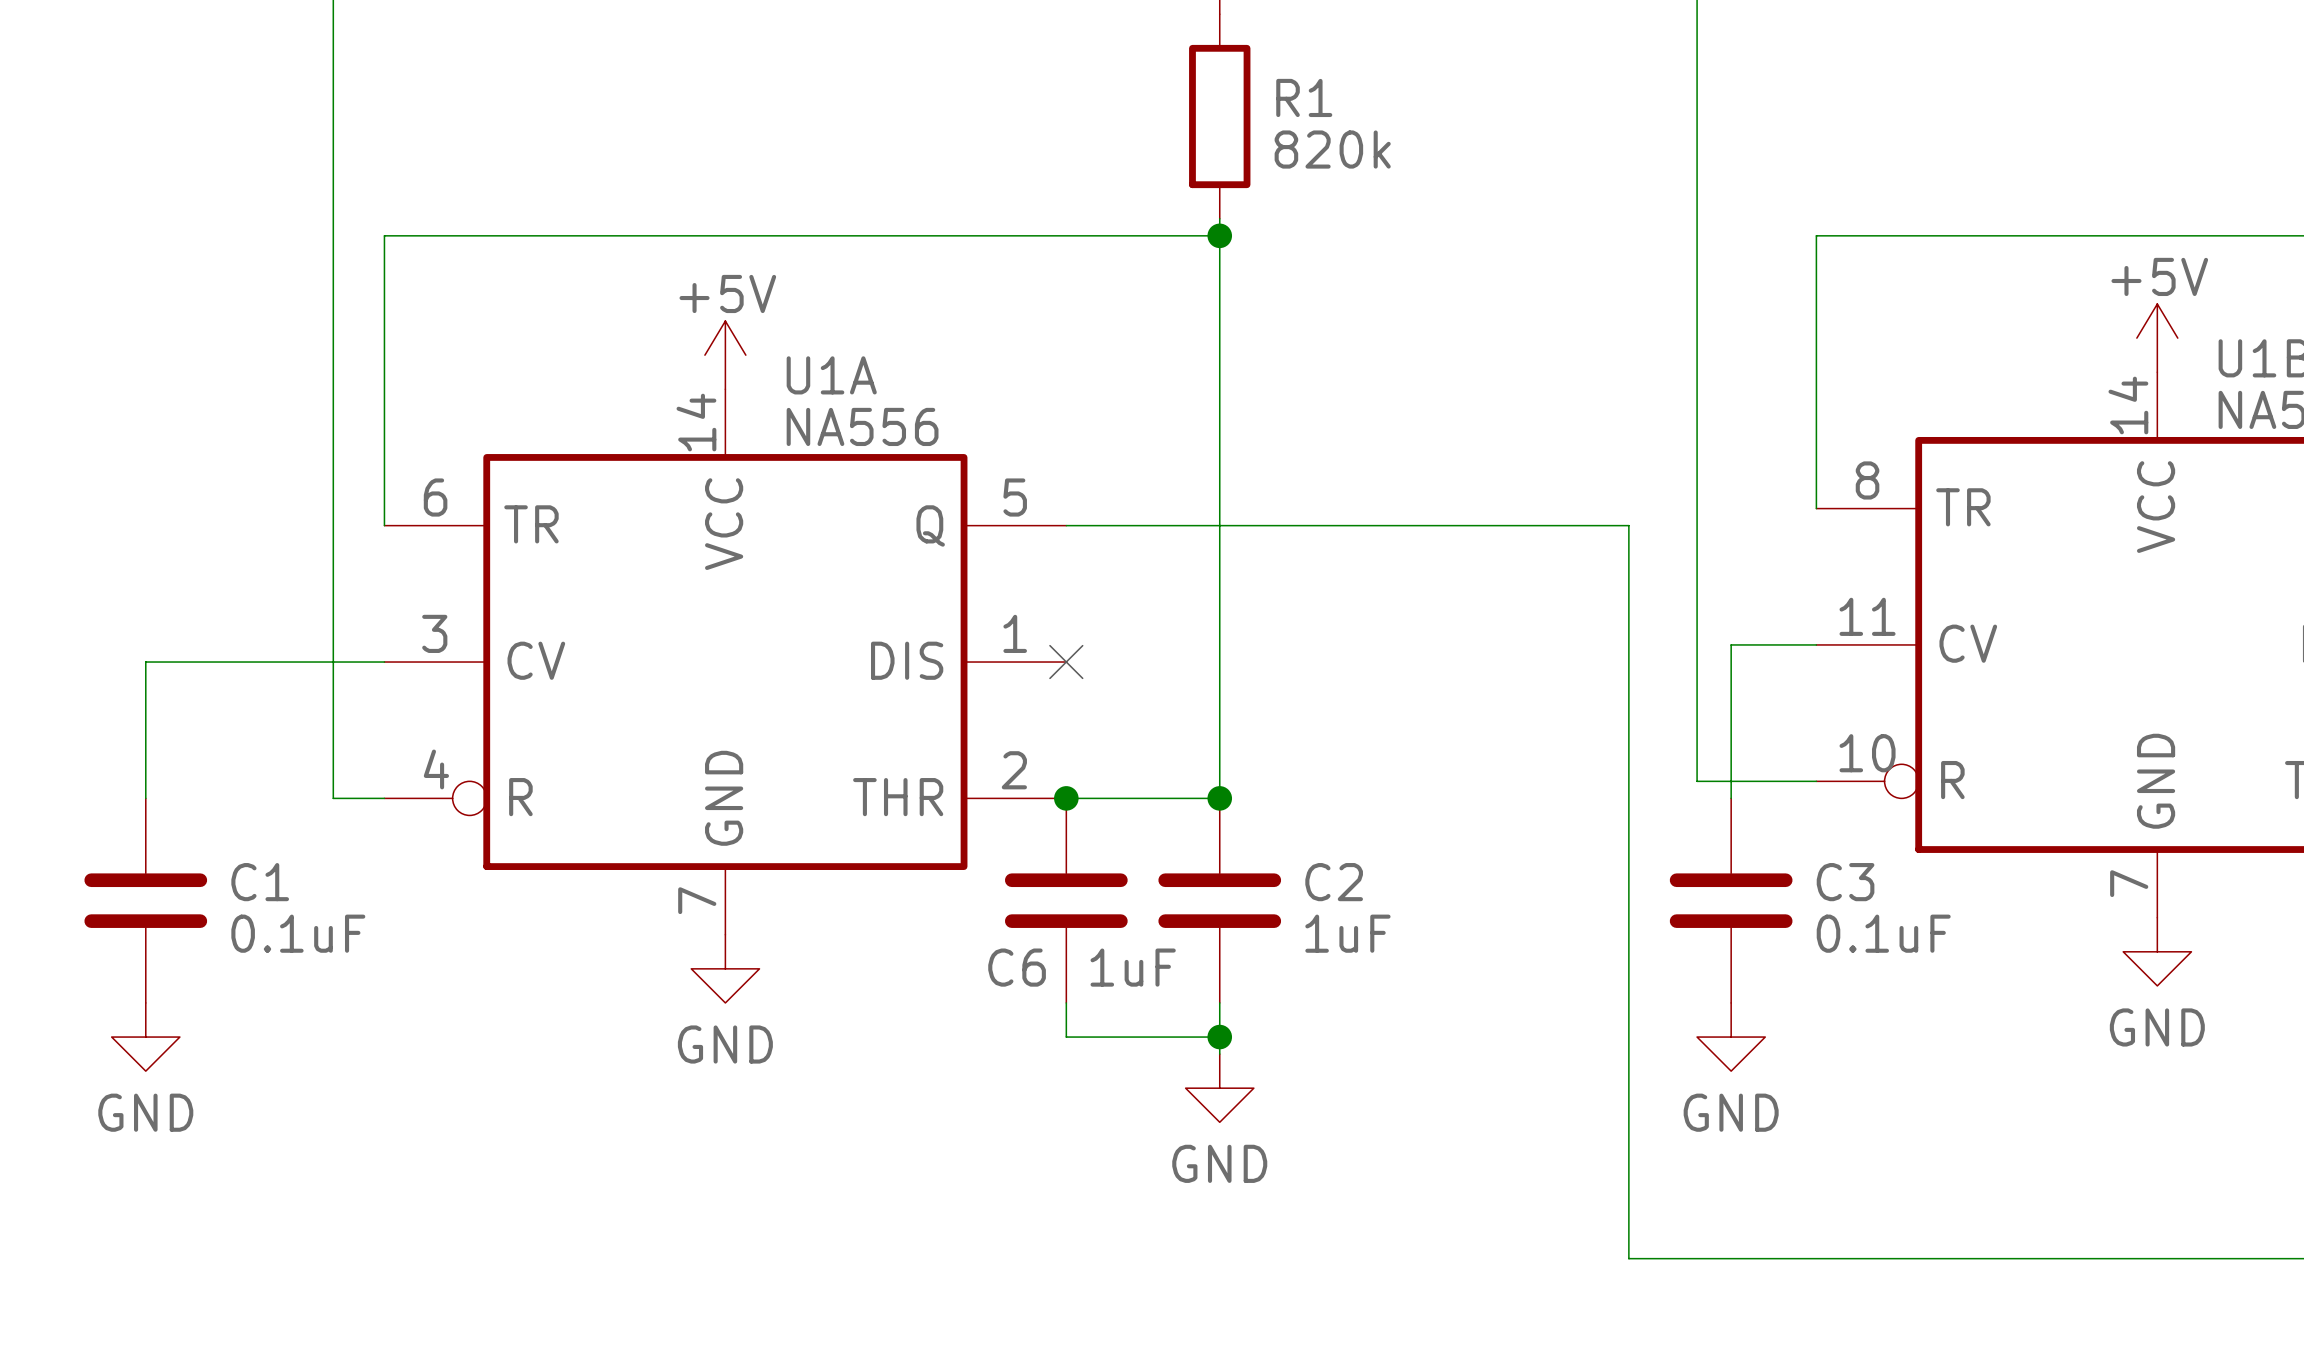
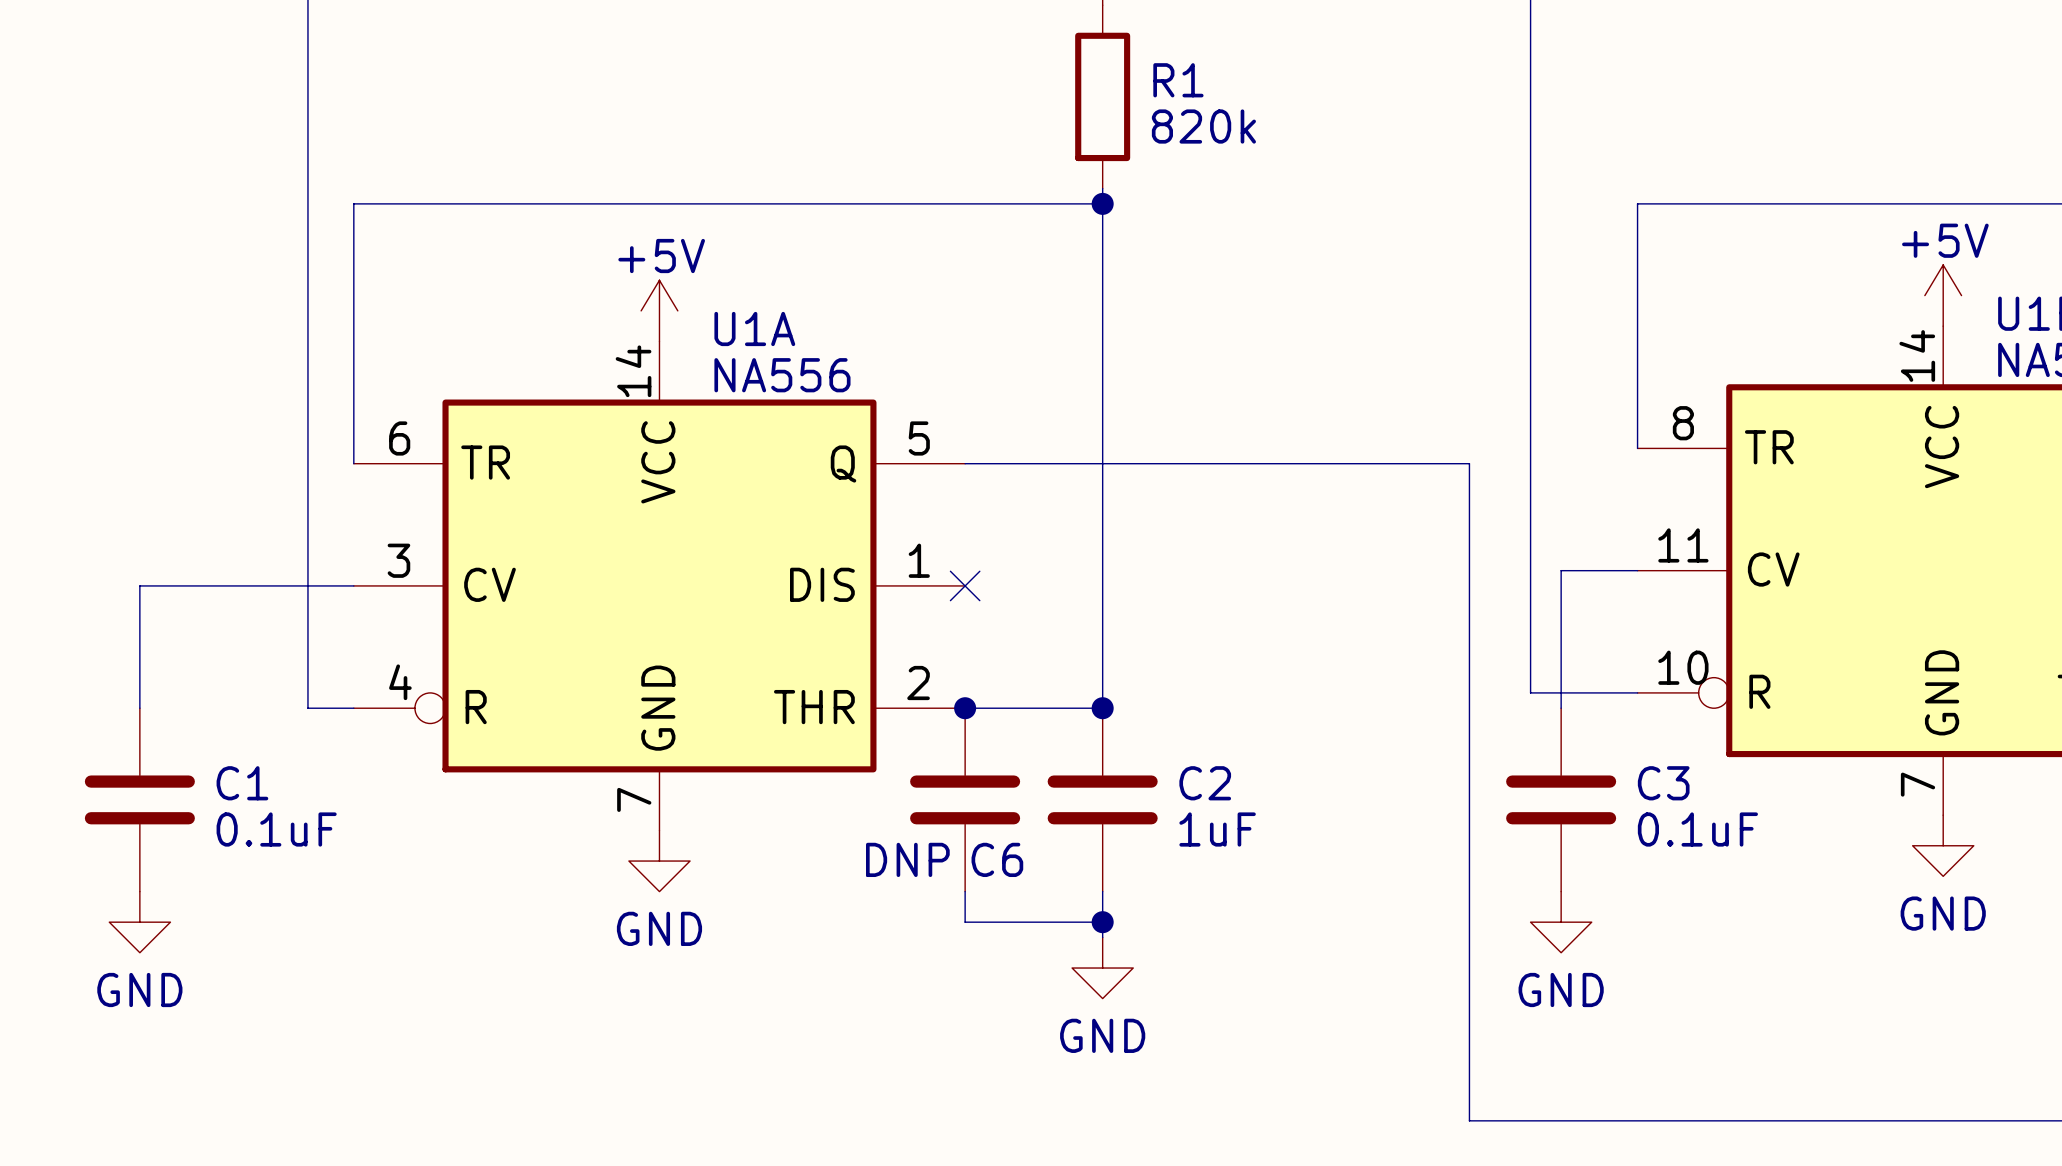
C6 name position: C6 (1017, 967) -> C6 (997, 859)
C6 value: 1uF (1133, 967) -> DNP (907, 859)

